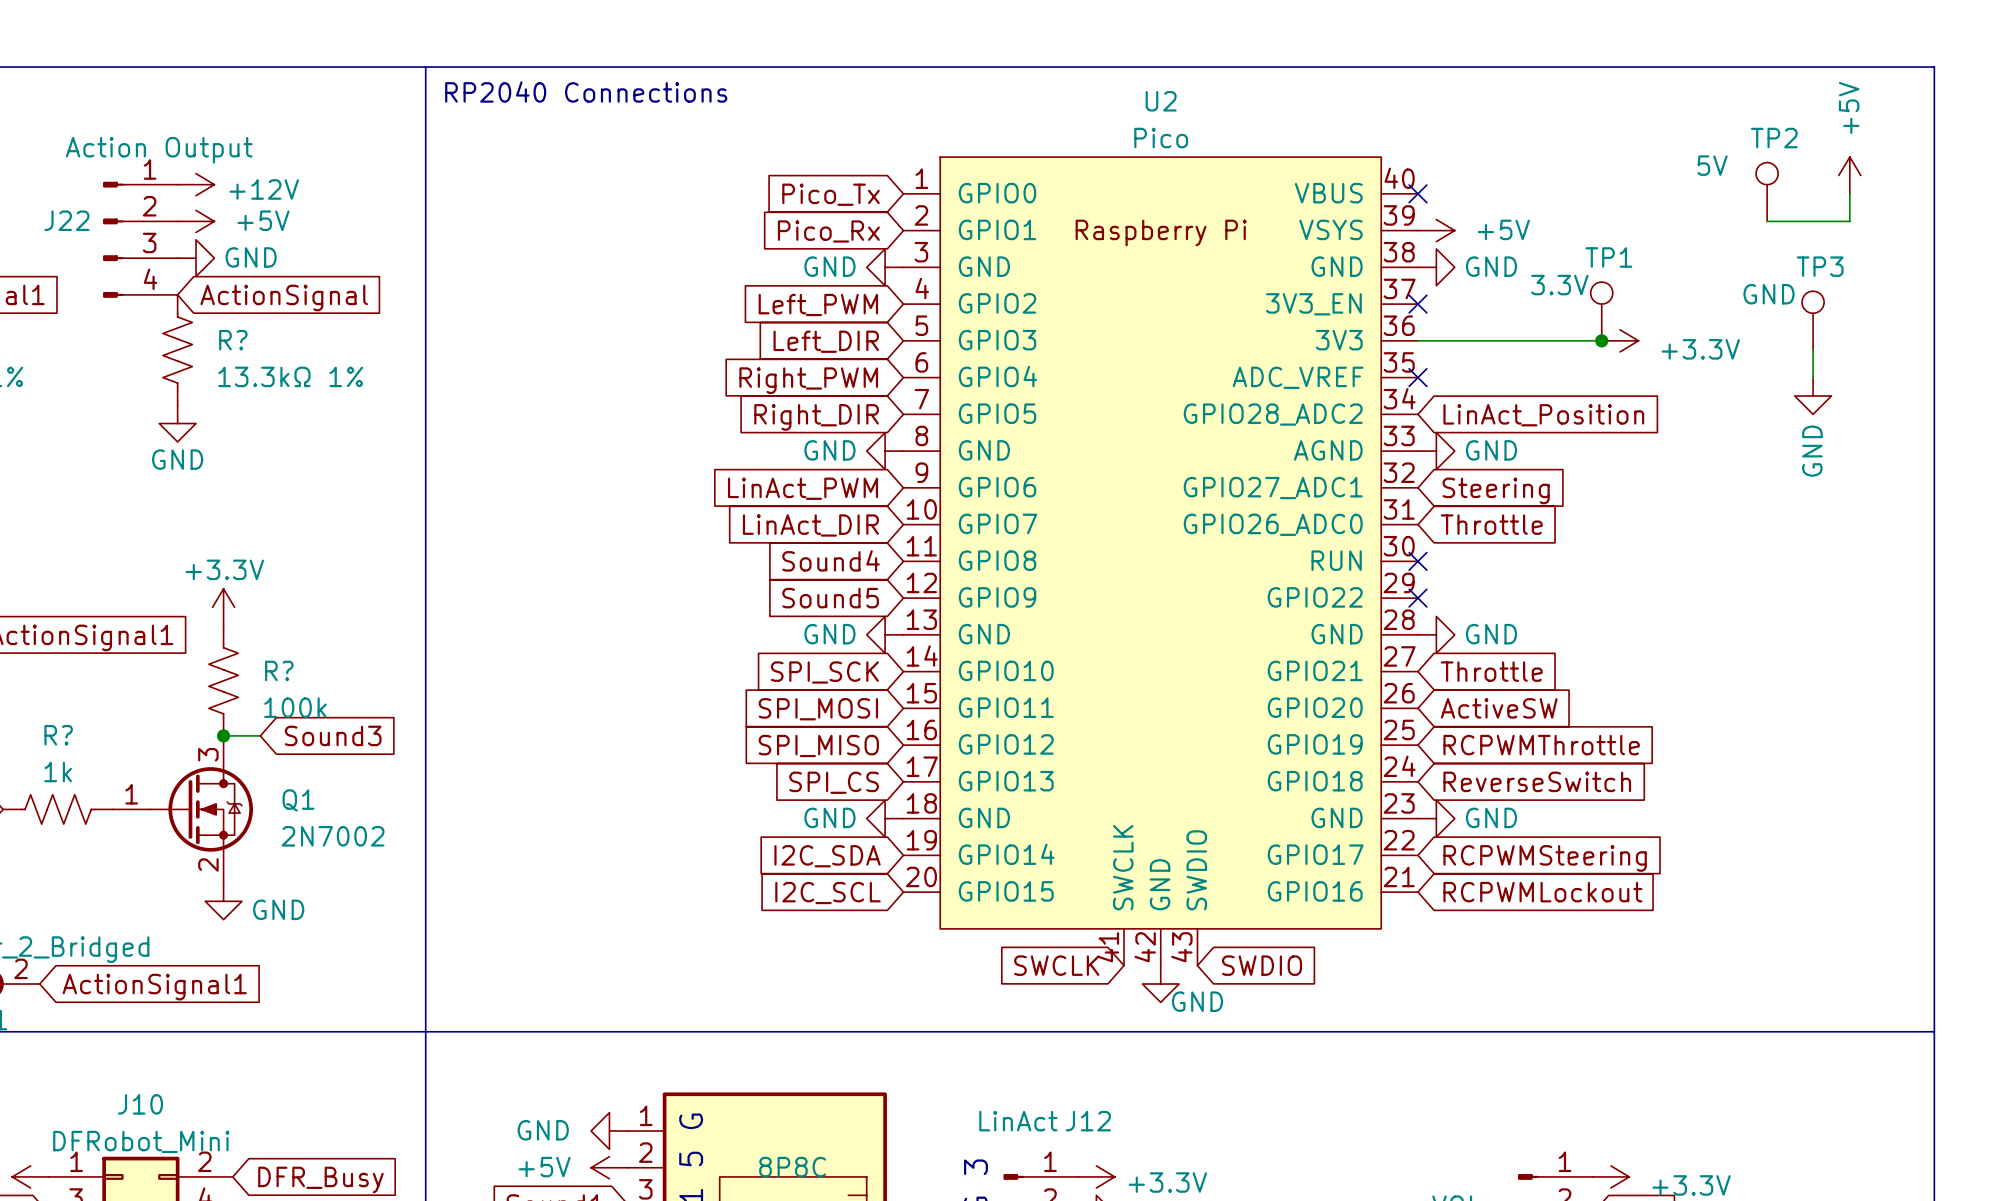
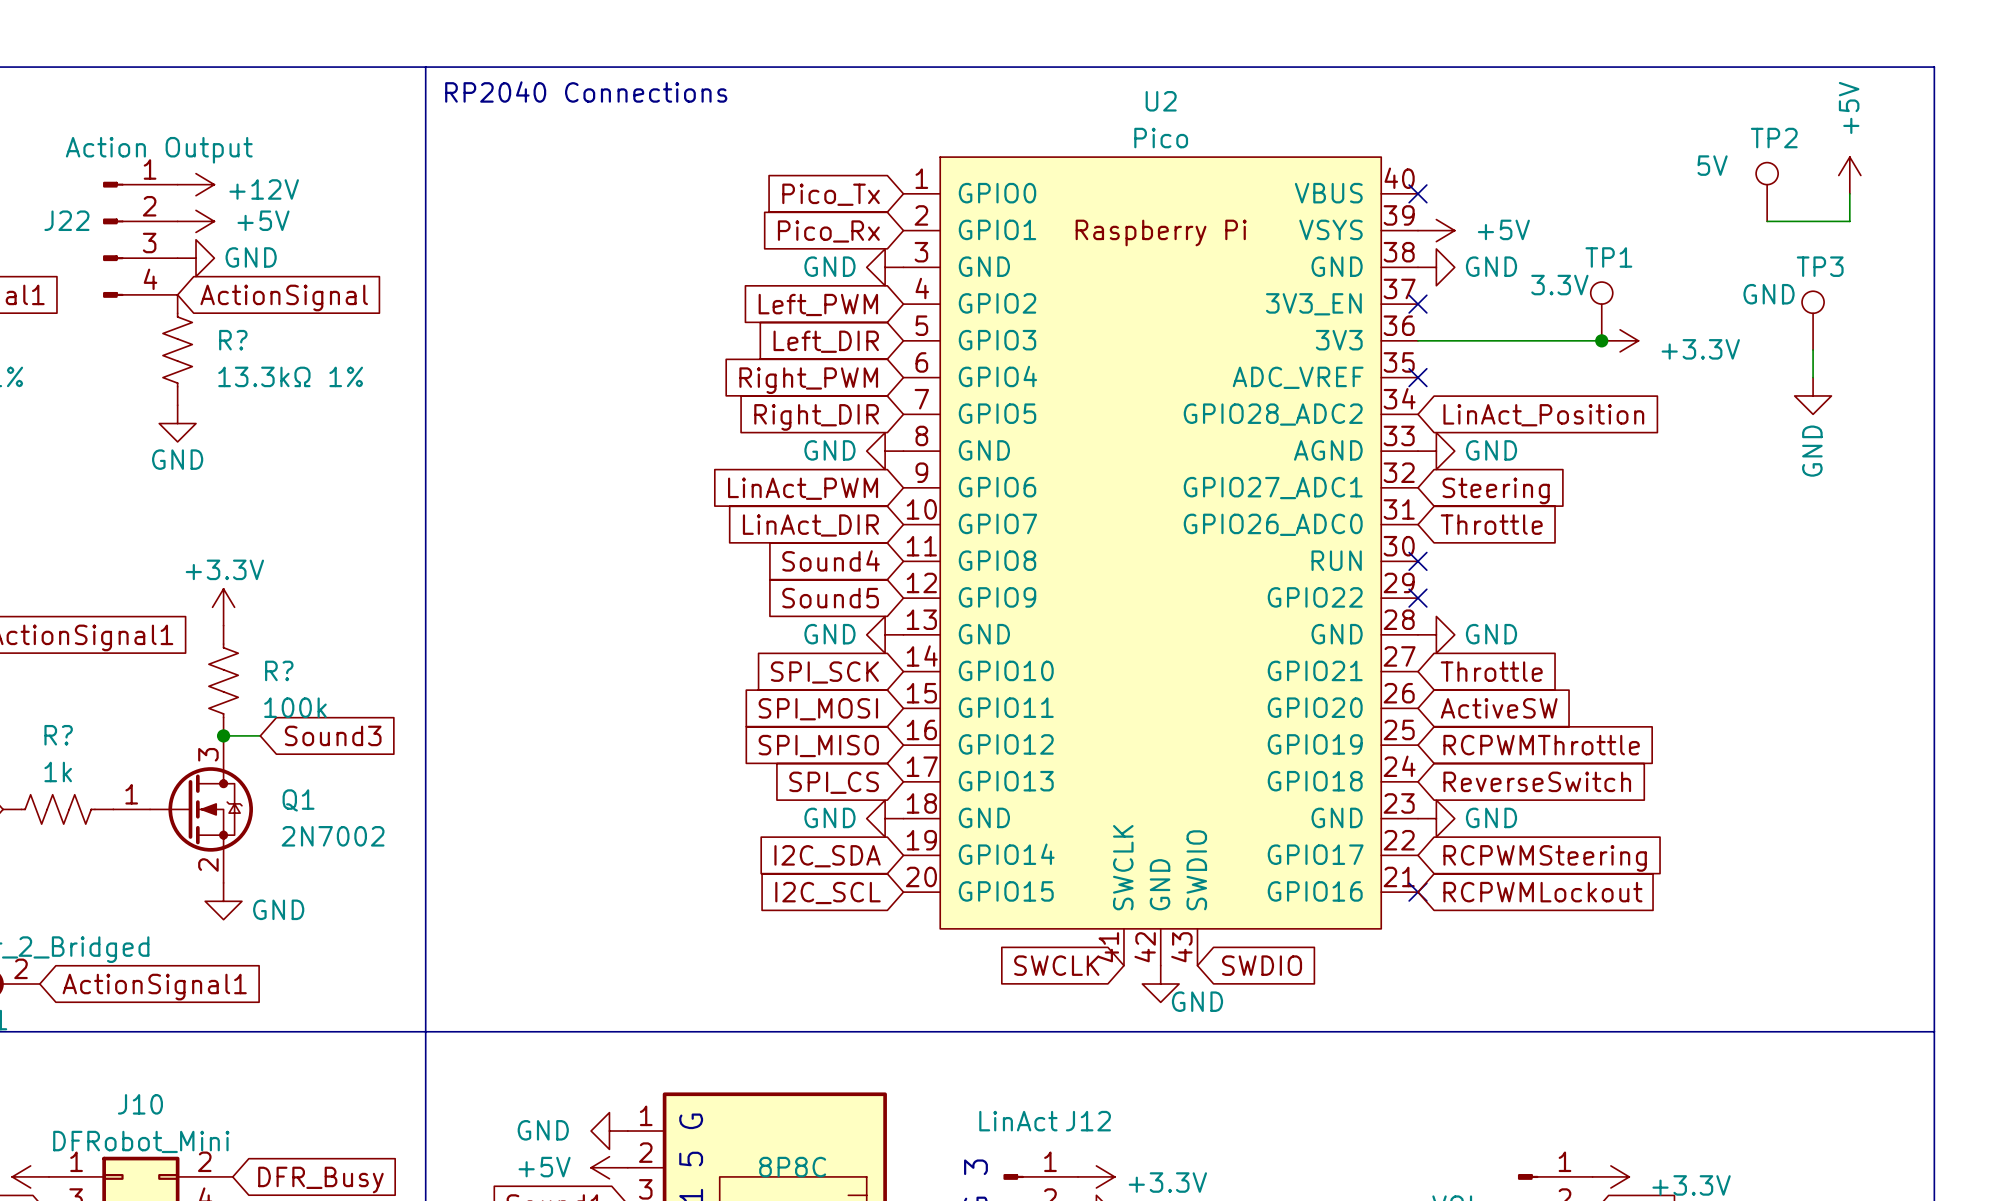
no-connect mark: none -> (1417, 892)

